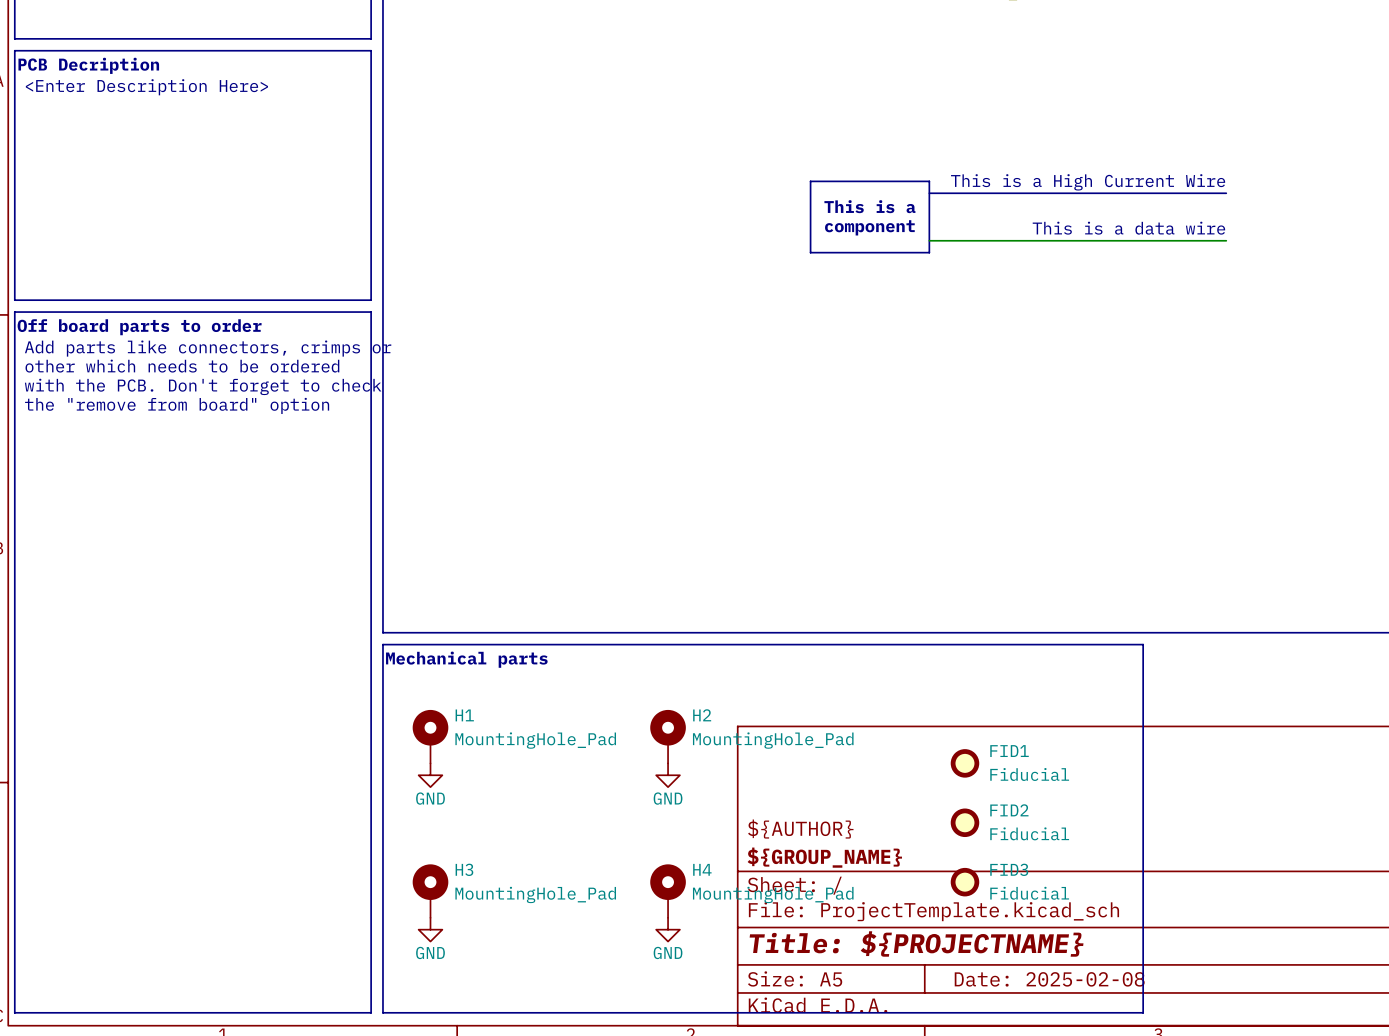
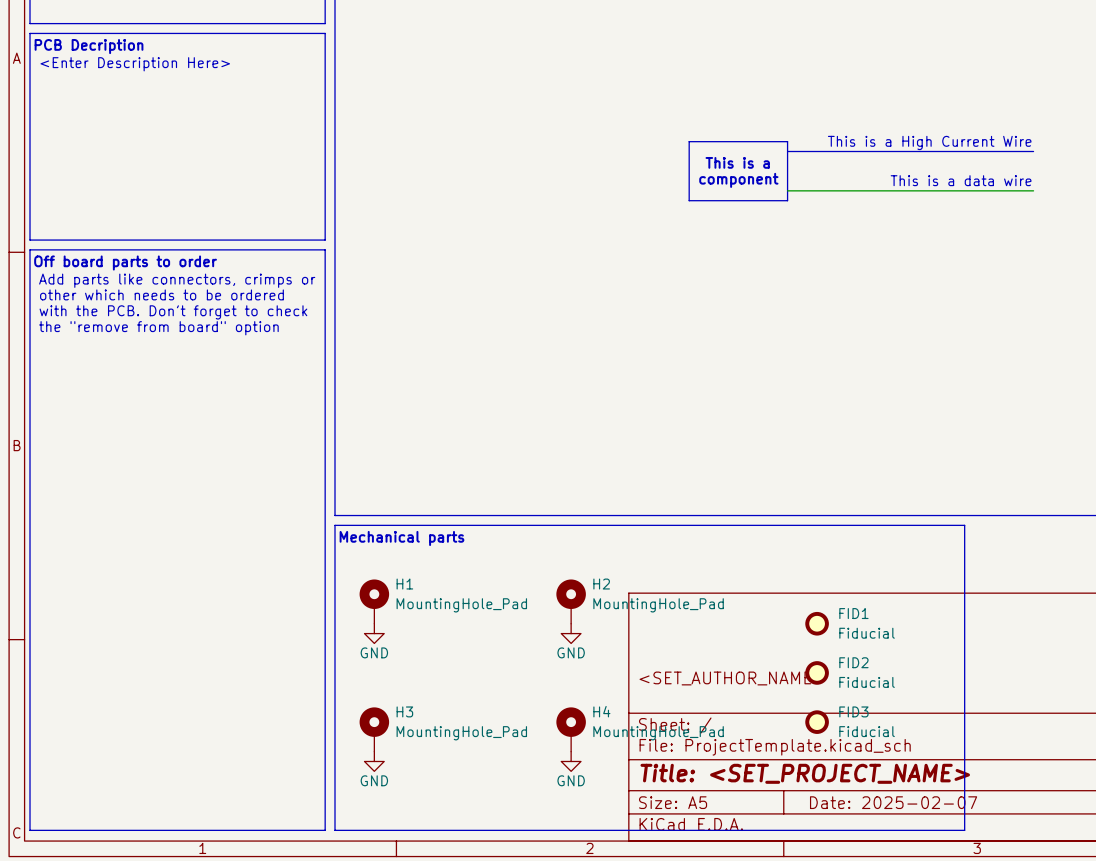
title block: ${AUTHOR} (800, 829) -> <SET_AUTHOR_NAME> (732, 678)
title block: ${GROUP_NAME} (824, 857) -> none
title block: Title: ${PROJECTNAME} (916, 943) -> Title: <SET_PROJECT_NAME> (805, 773)
title block: Date: 2025-02-08 (1049, 979) -> Date: 2025-02-07 (893, 802)

